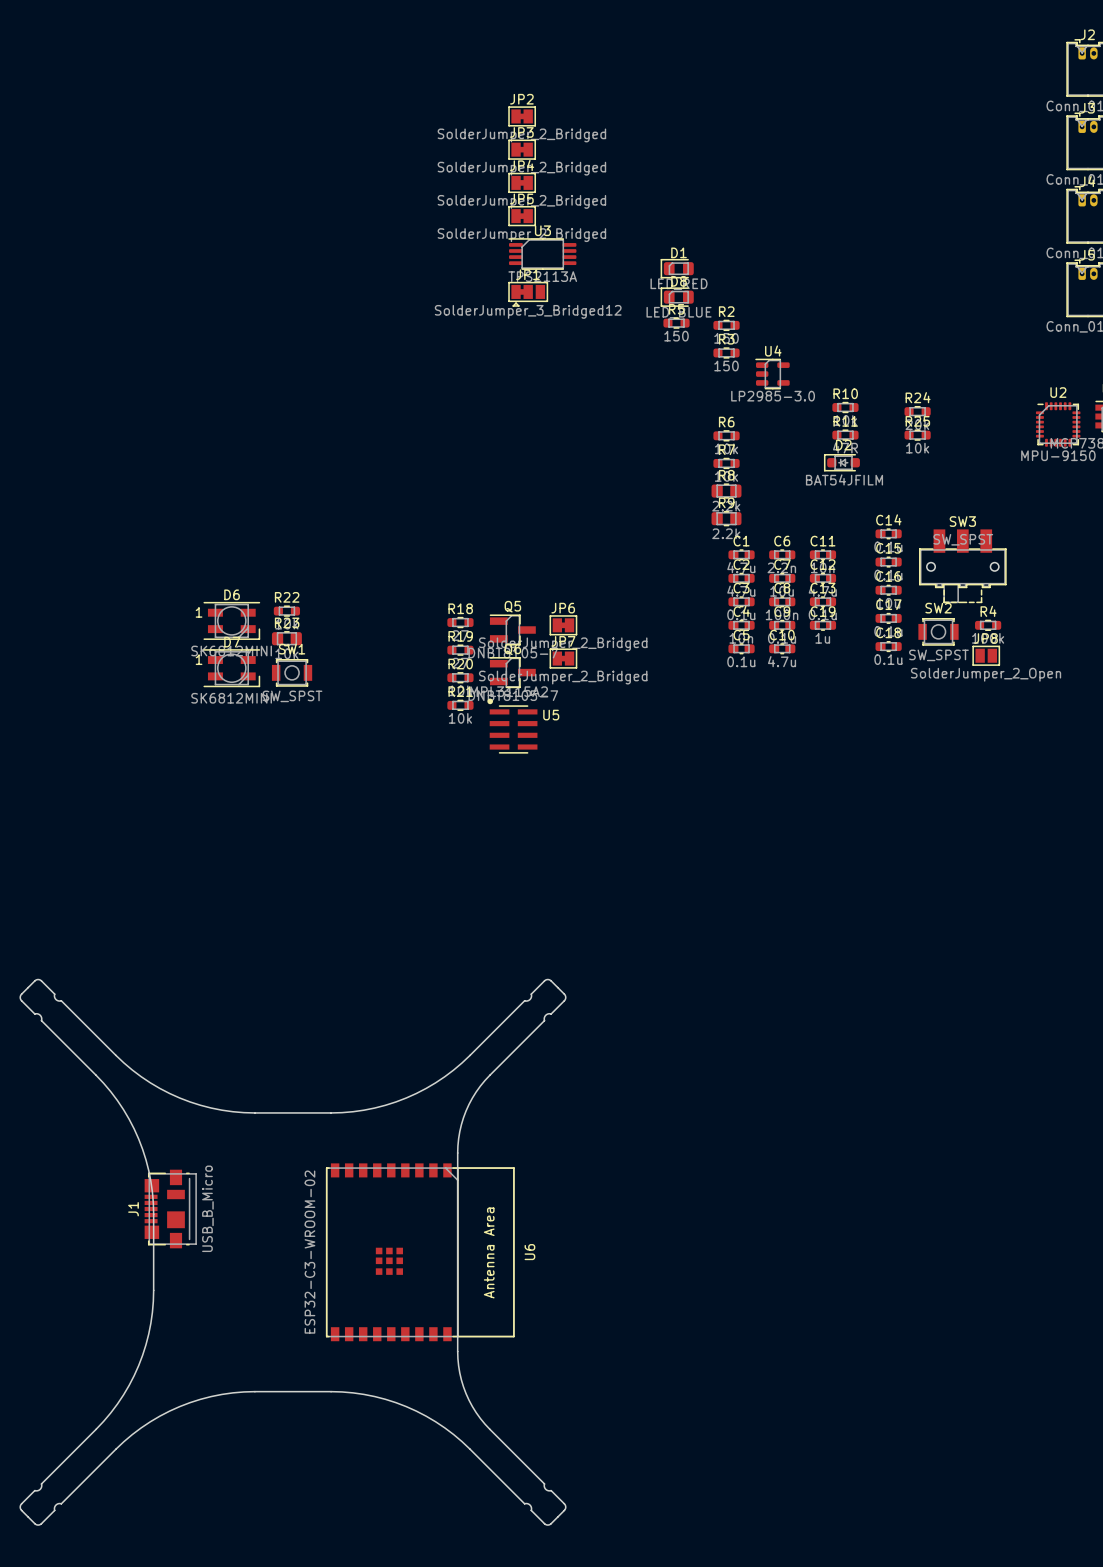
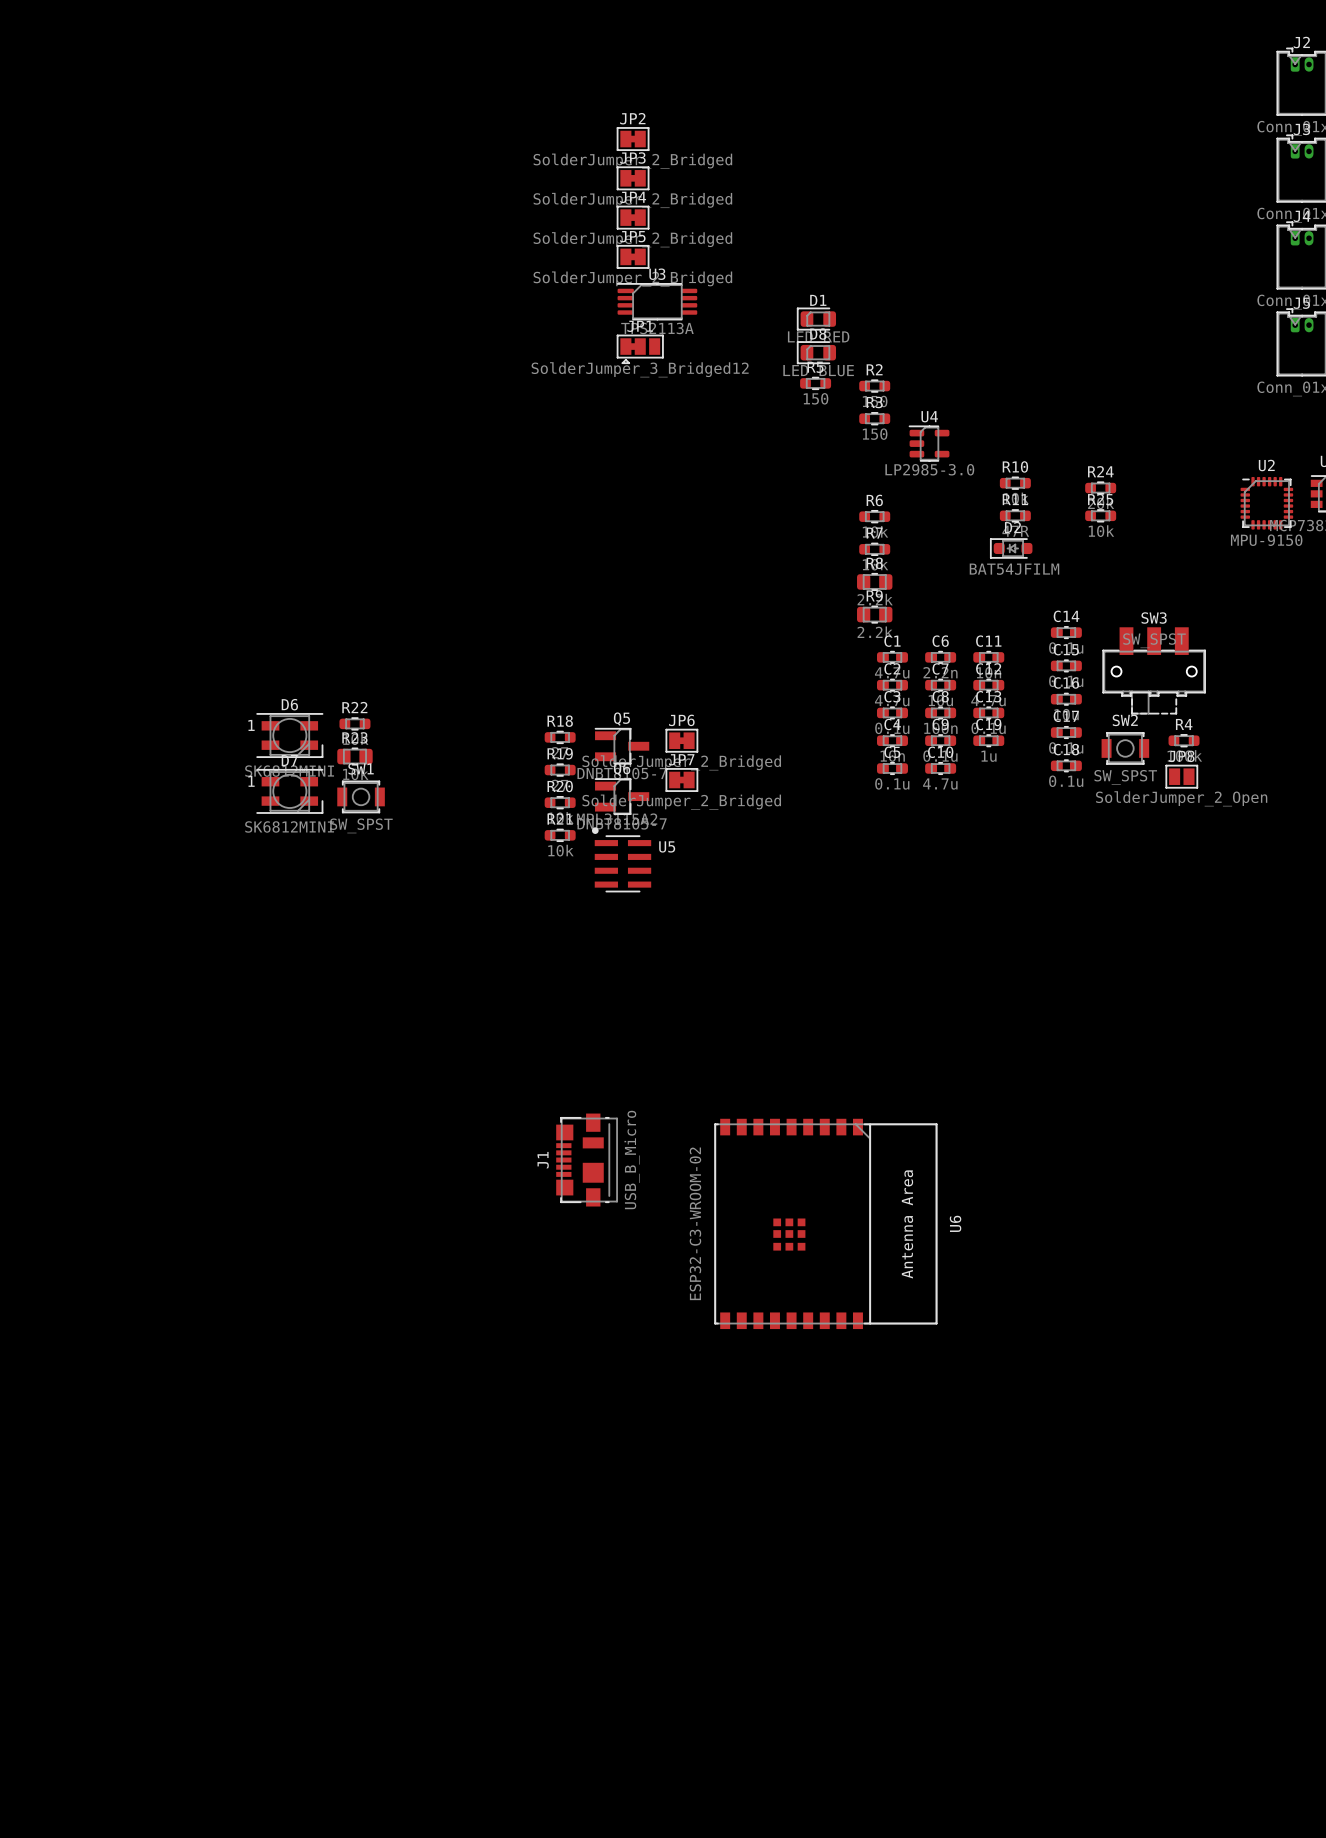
drawing: [20, 979, 566, 1526] -> none
J1 position: (170, 1209) -> (586, 1160)
U6 position: (420, 1252) -> (825, 1223)

